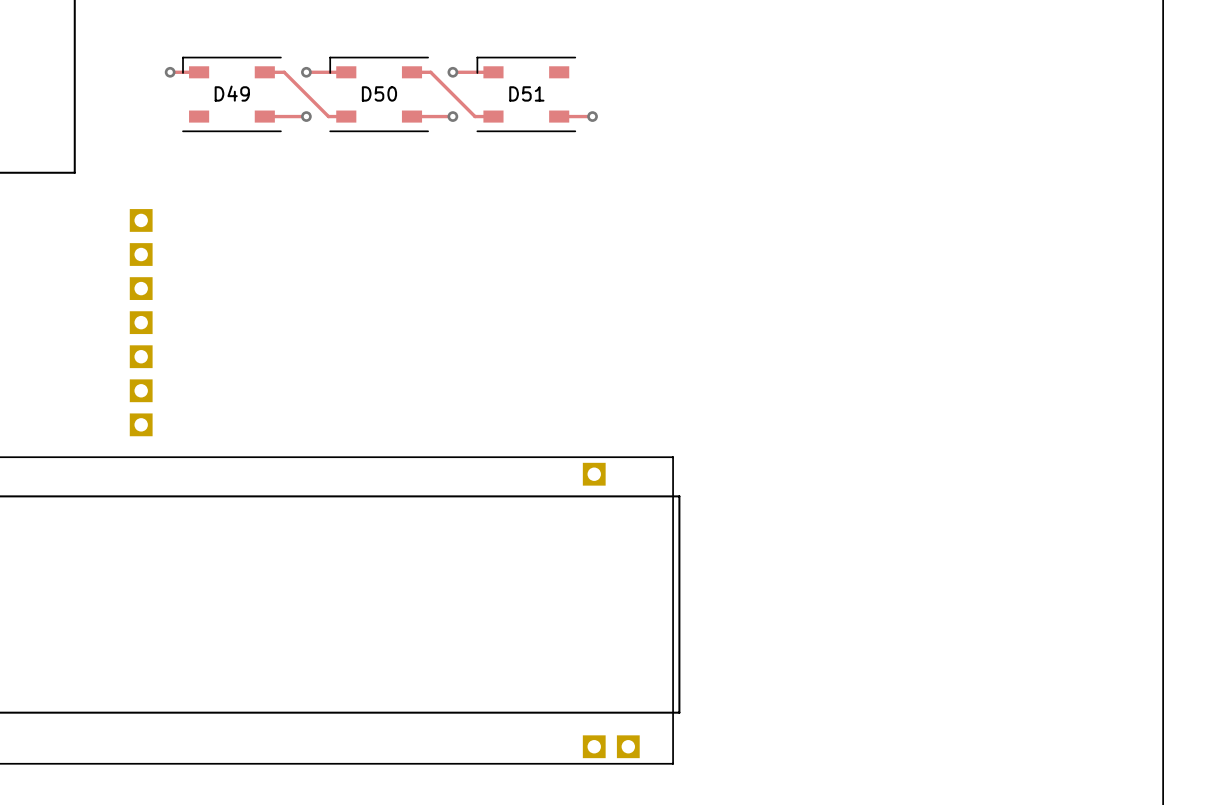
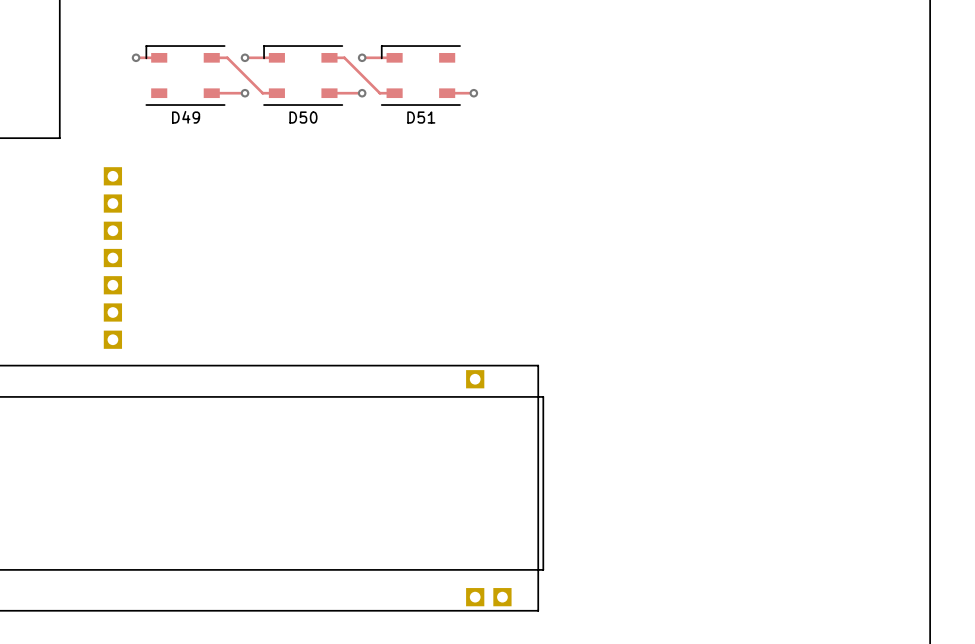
D49 name position: D49 (232, 93) -> D49 (186, 117)
D50 name position: D50 (379, 93) -> D50 (303, 117)
D51 name position: D51 (526, 93) -> D51 (421, 117)

